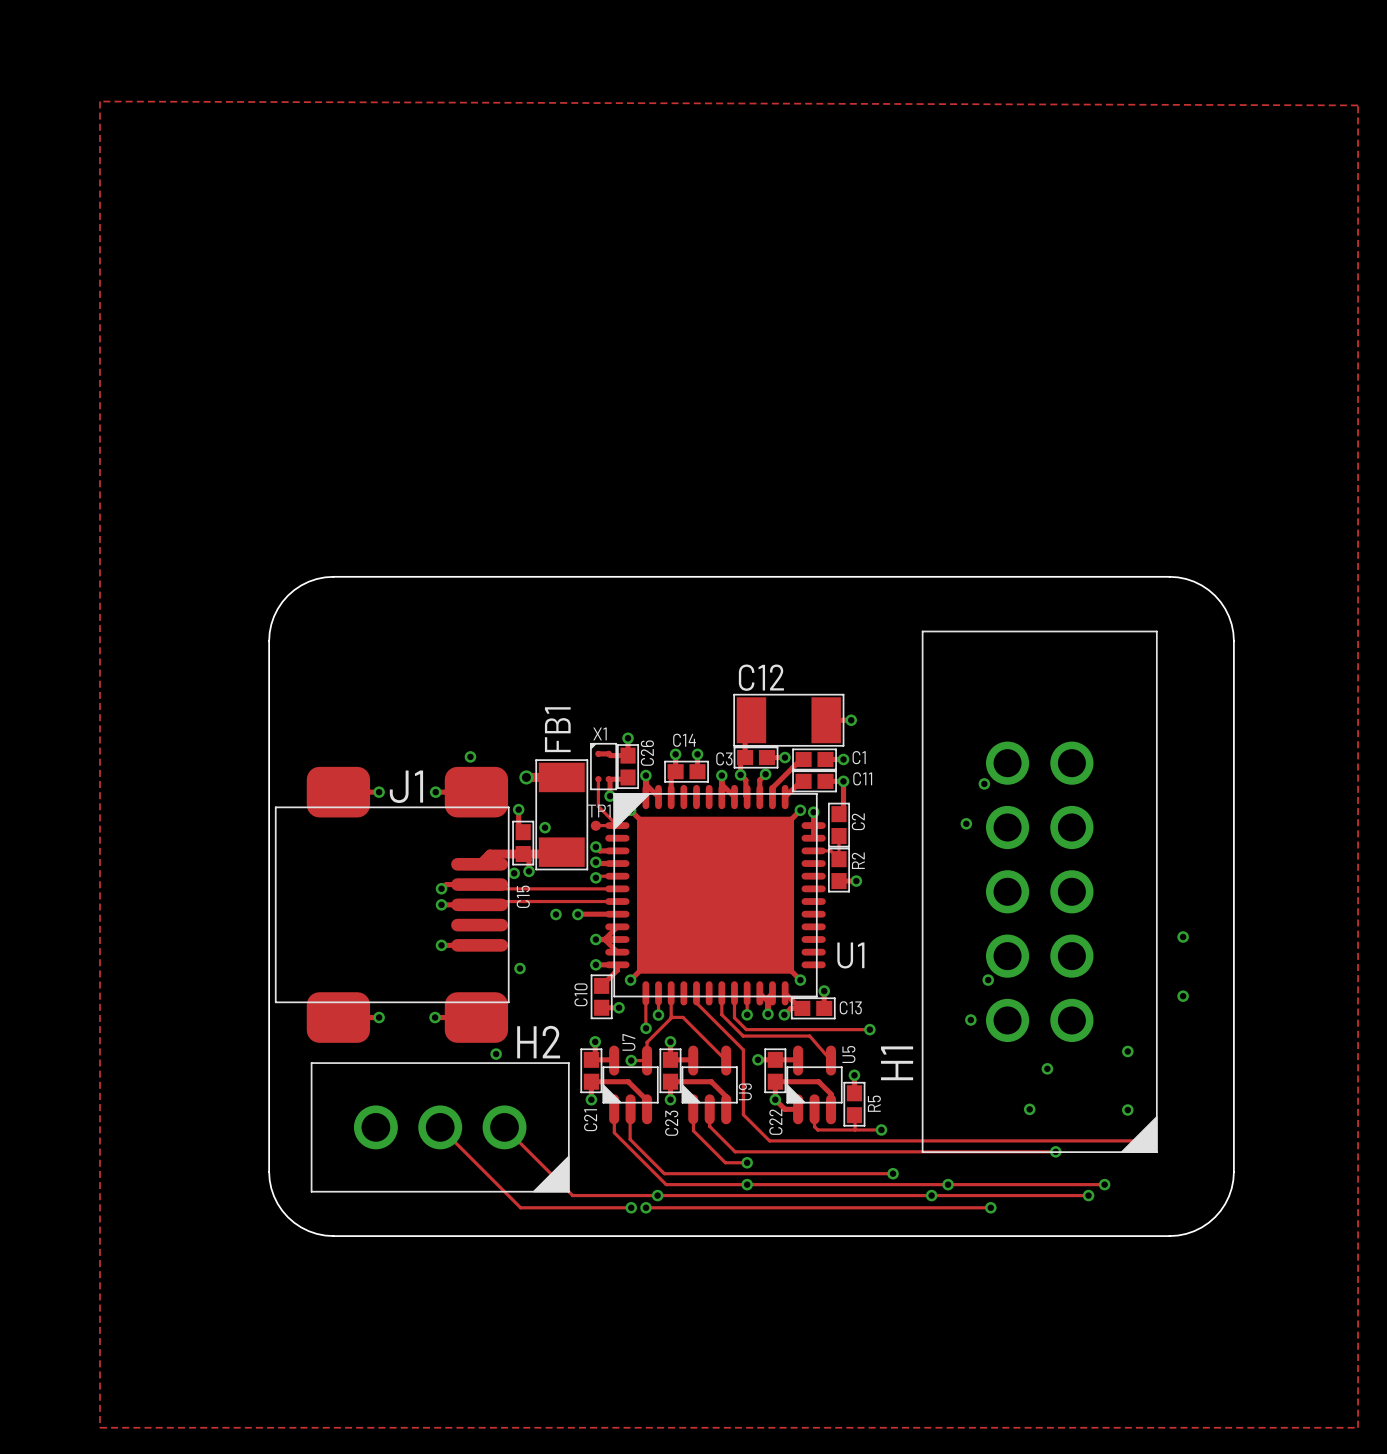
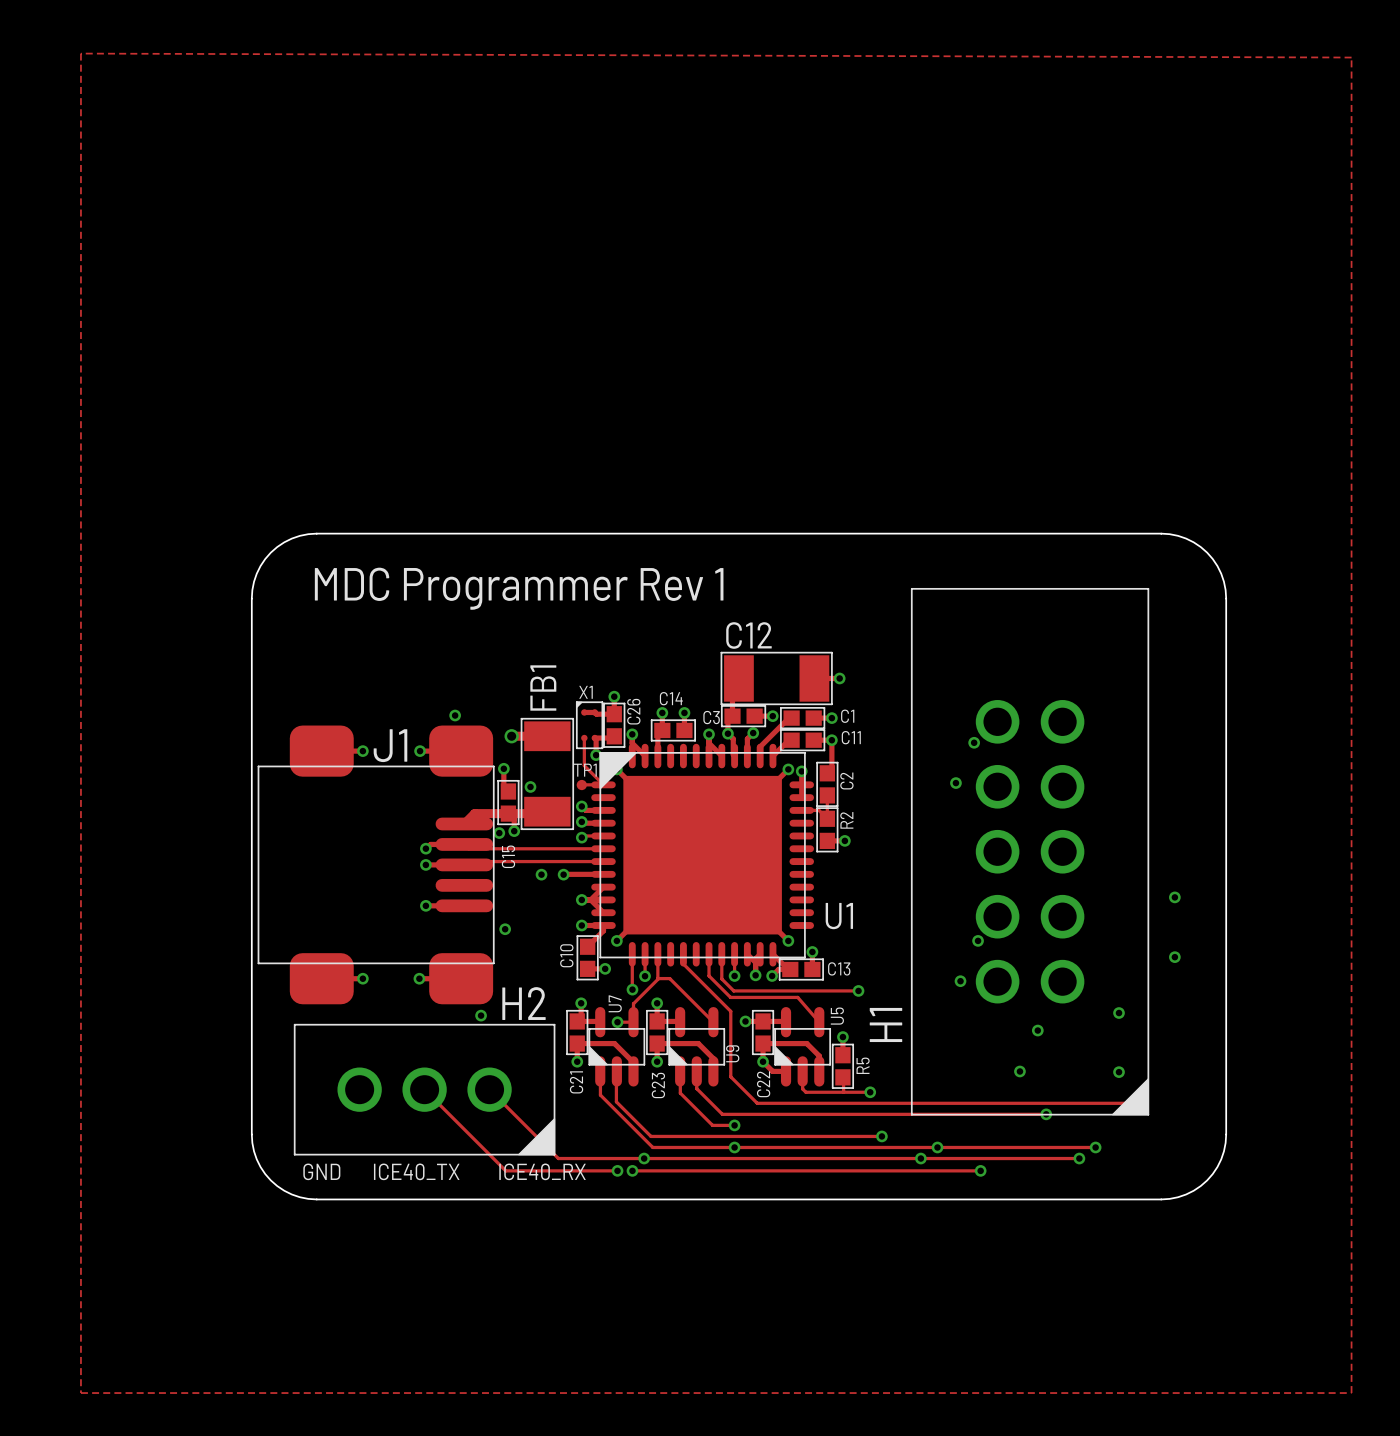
text: none -> MDC Programmer Rev 1 (519, 588)
text: none -> GND (321, 1171)
text: none -> ICE40_TX (416, 1171)
text: none -> ICE40_RX (542, 1171)

